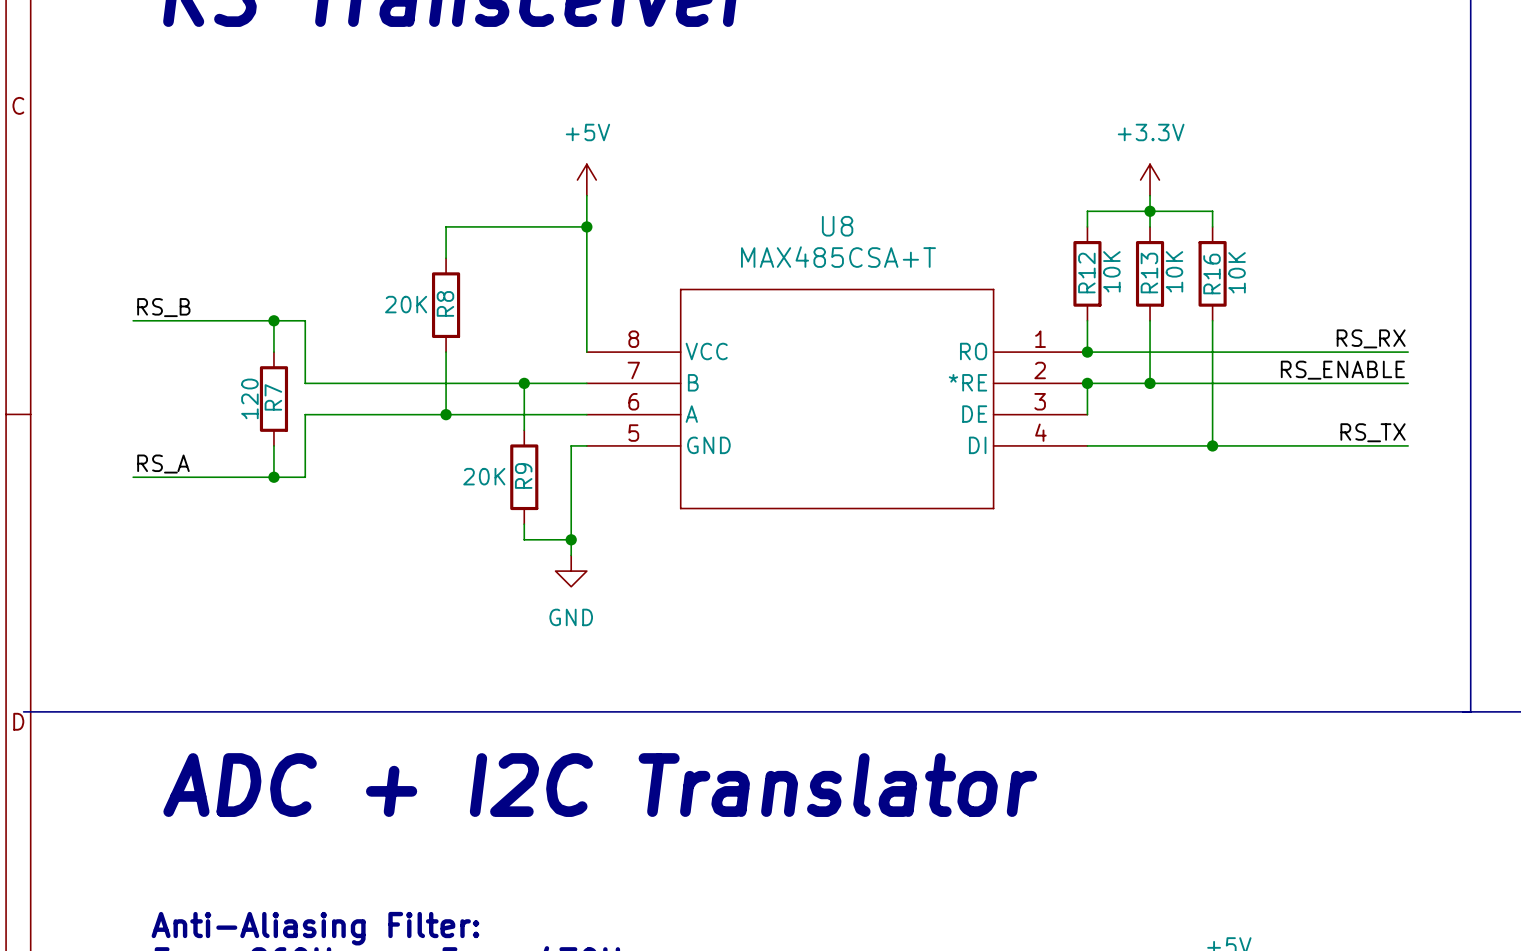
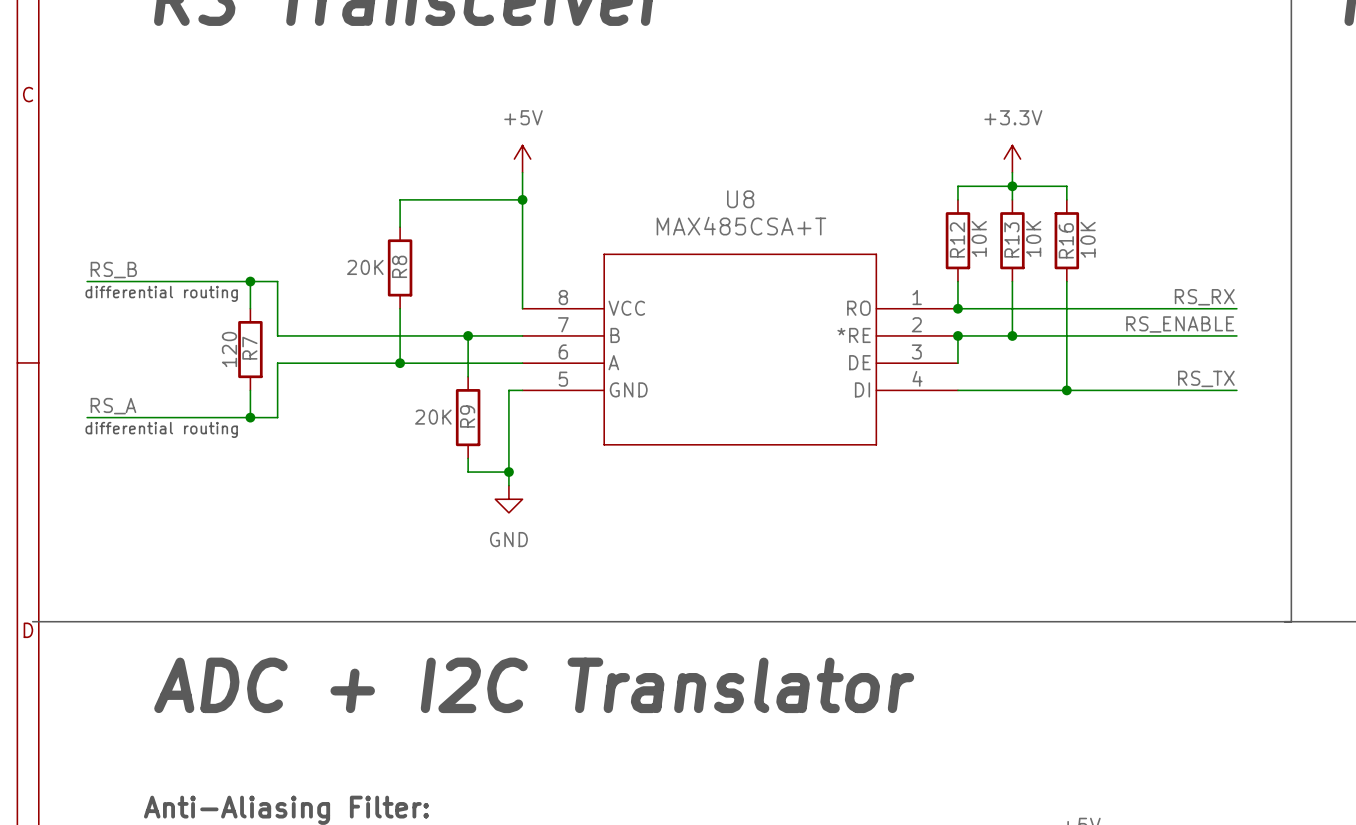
label position: RS_B (163, 307) -> RS_B (113, 270)
wire: none -> (87, 281) (127, 281)
text: none -> differential routing (161, 293)
label position: RS_A (163, 464) -> RS_A (113, 406)
wire: none -> (87, 417) (127, 417)
text: none -> differential routing (161, 429)

